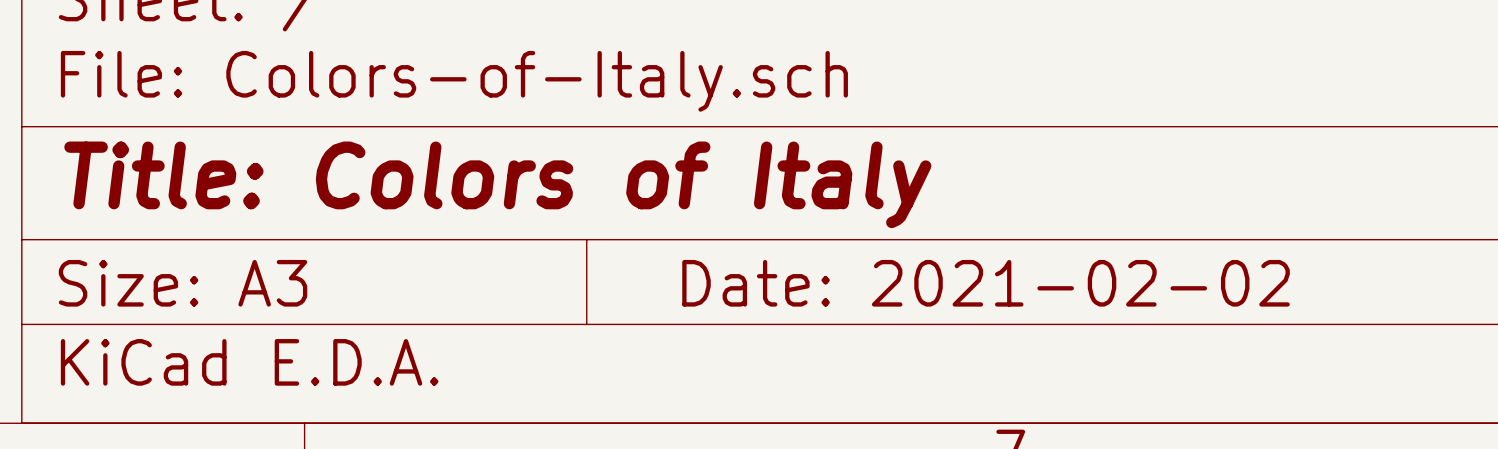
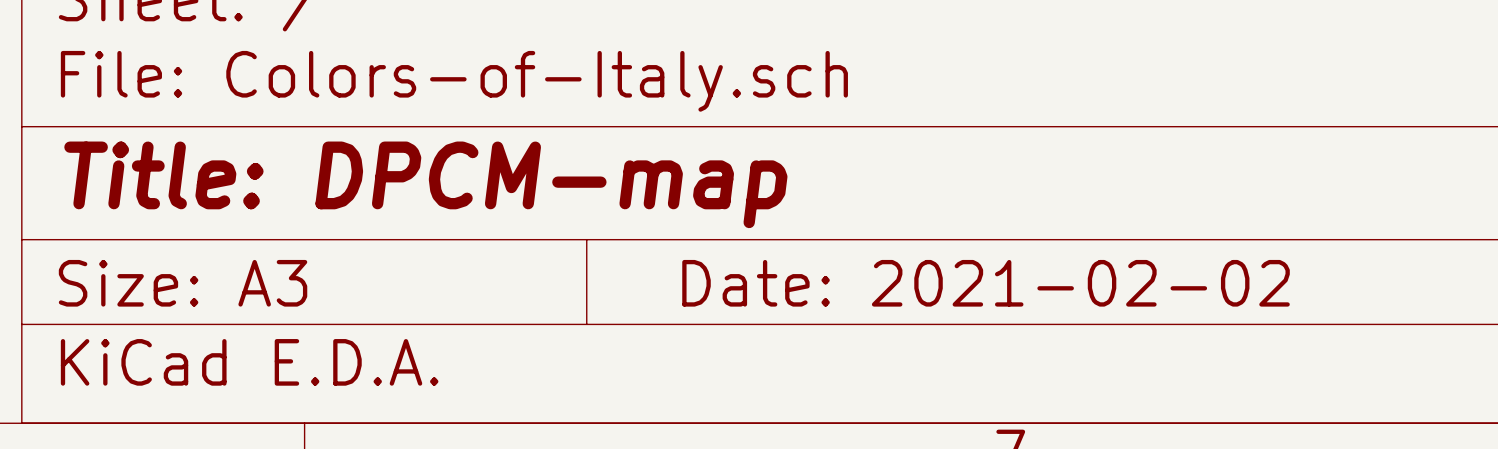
title block: Title: Colors of Italy (497, 184) -> Title: DPCM-map (425, 184)

